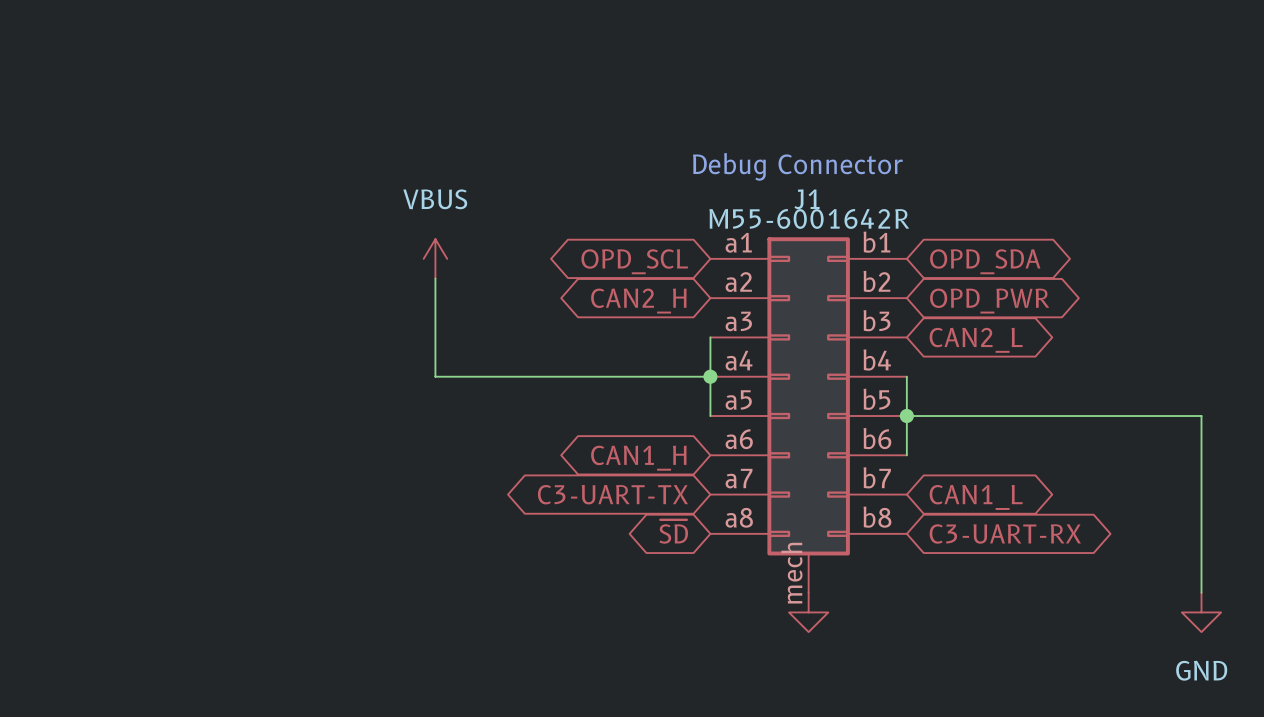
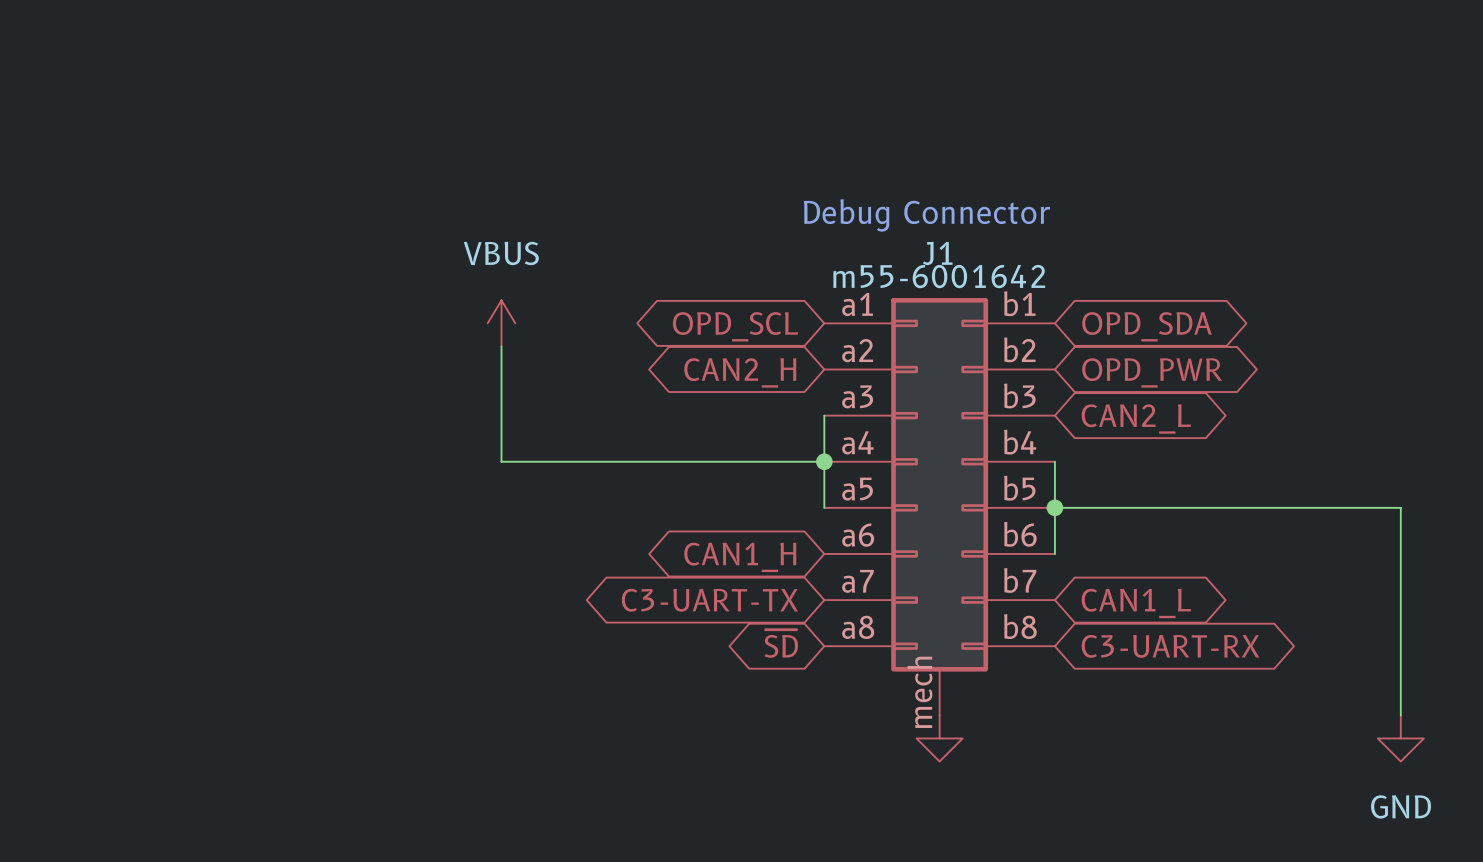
J1 value: M55-6001642R (809, 218) -> m55-6001642 (939, 276)

